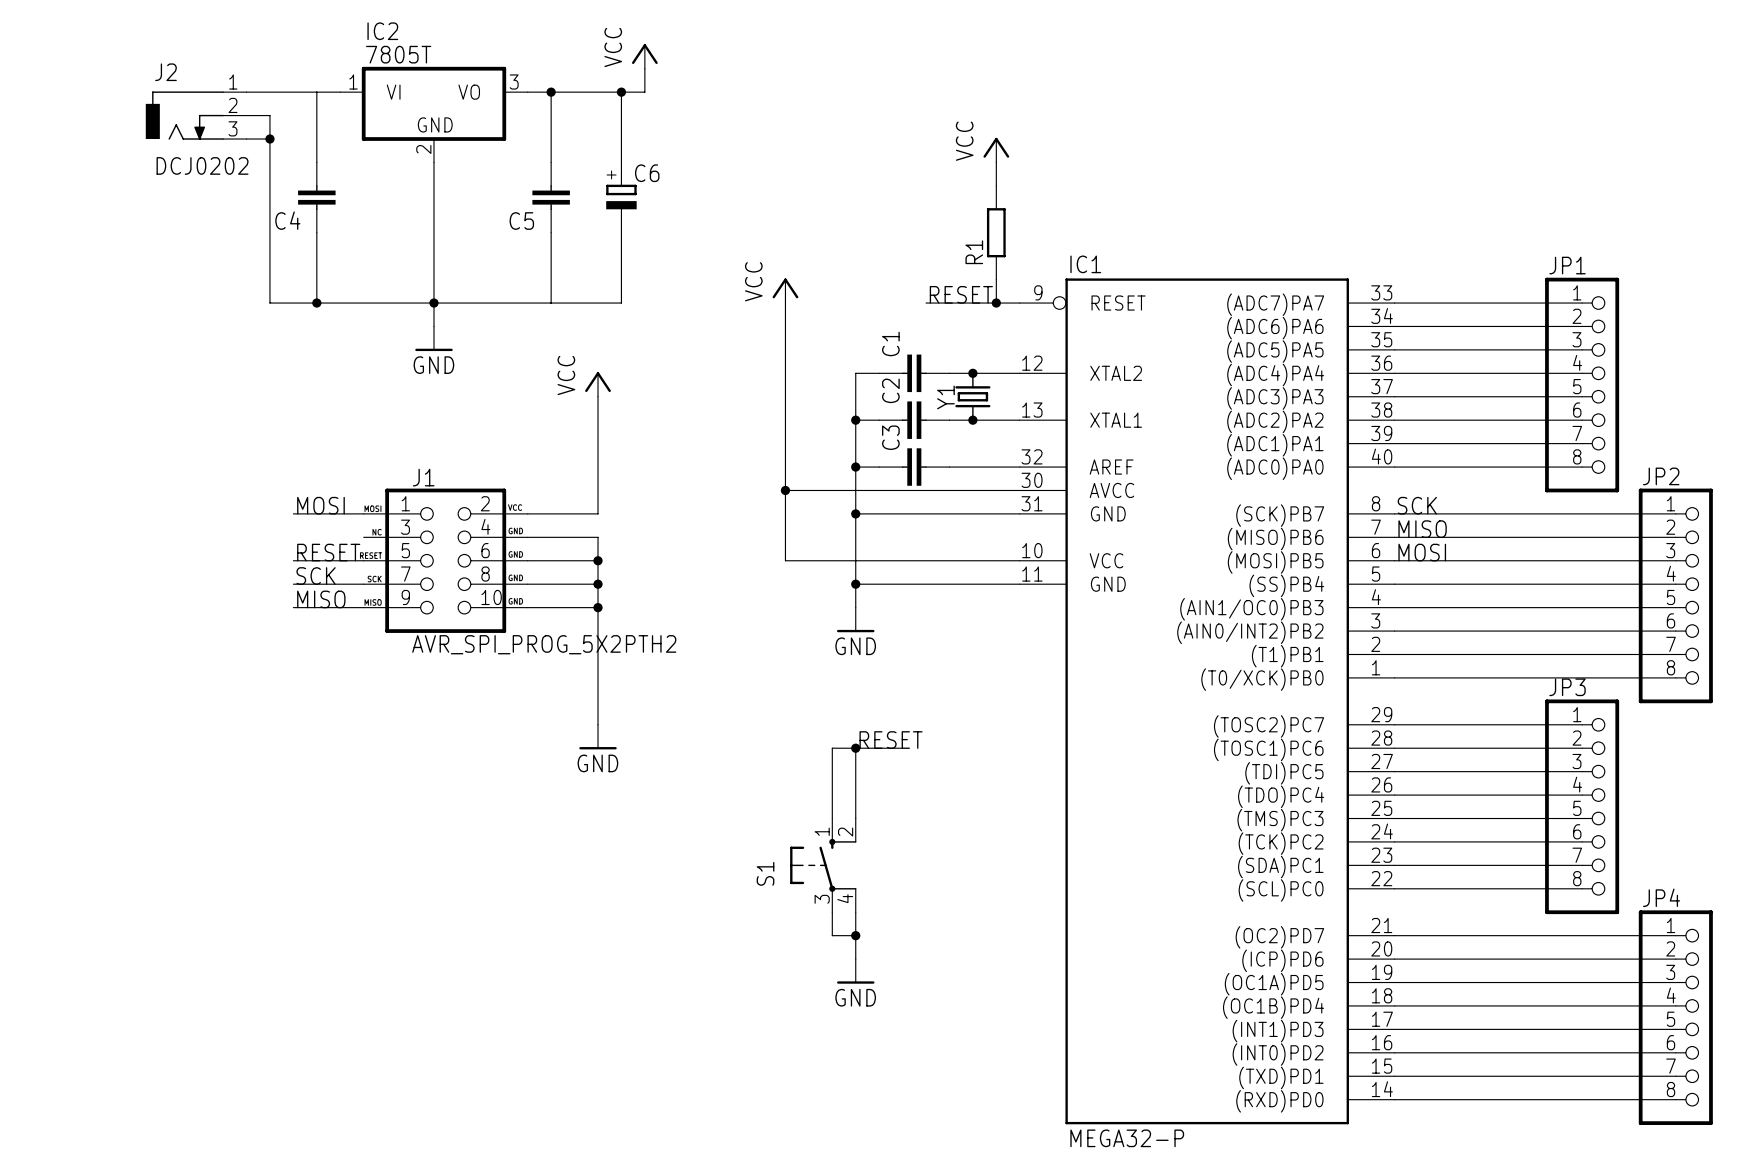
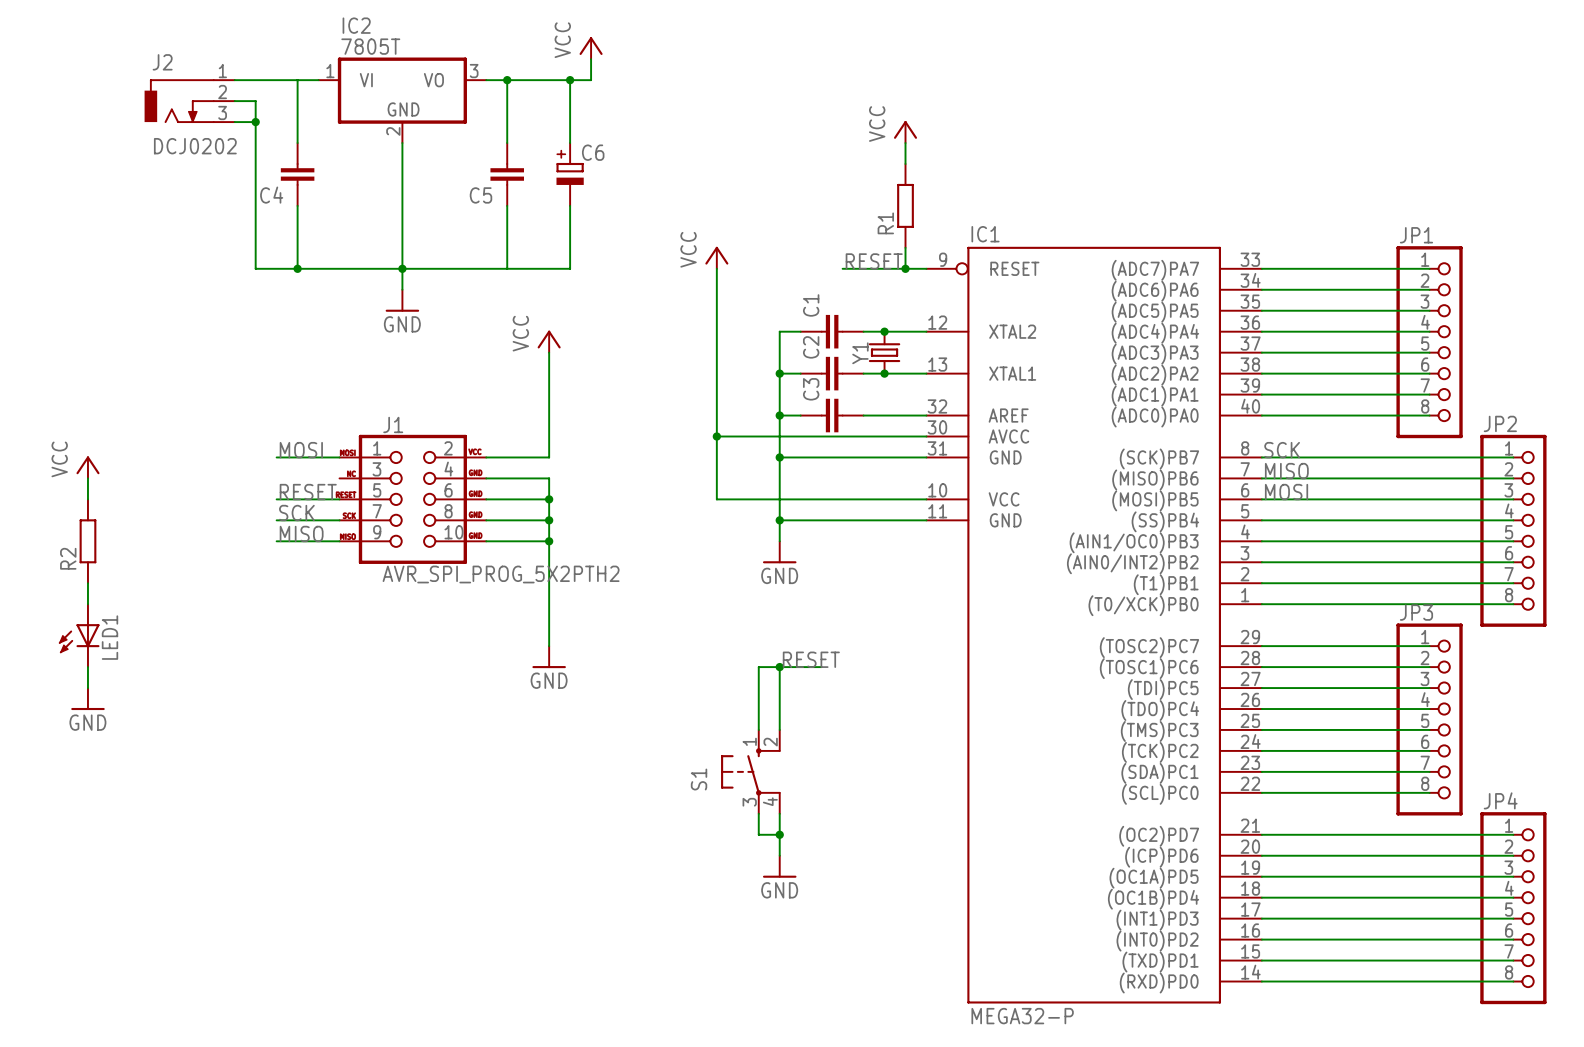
power symbol: none -> VCC (87, 467)
wire: none -> (87, 478) (87, 499)
R2: none -> (87, 541)
wire: none -> (87, 583) (87, 604)
LED1: none -> (79, 635)
wire: none -> (87, 667) (87, 688)
power symbol: none -> GND (87, 699)

